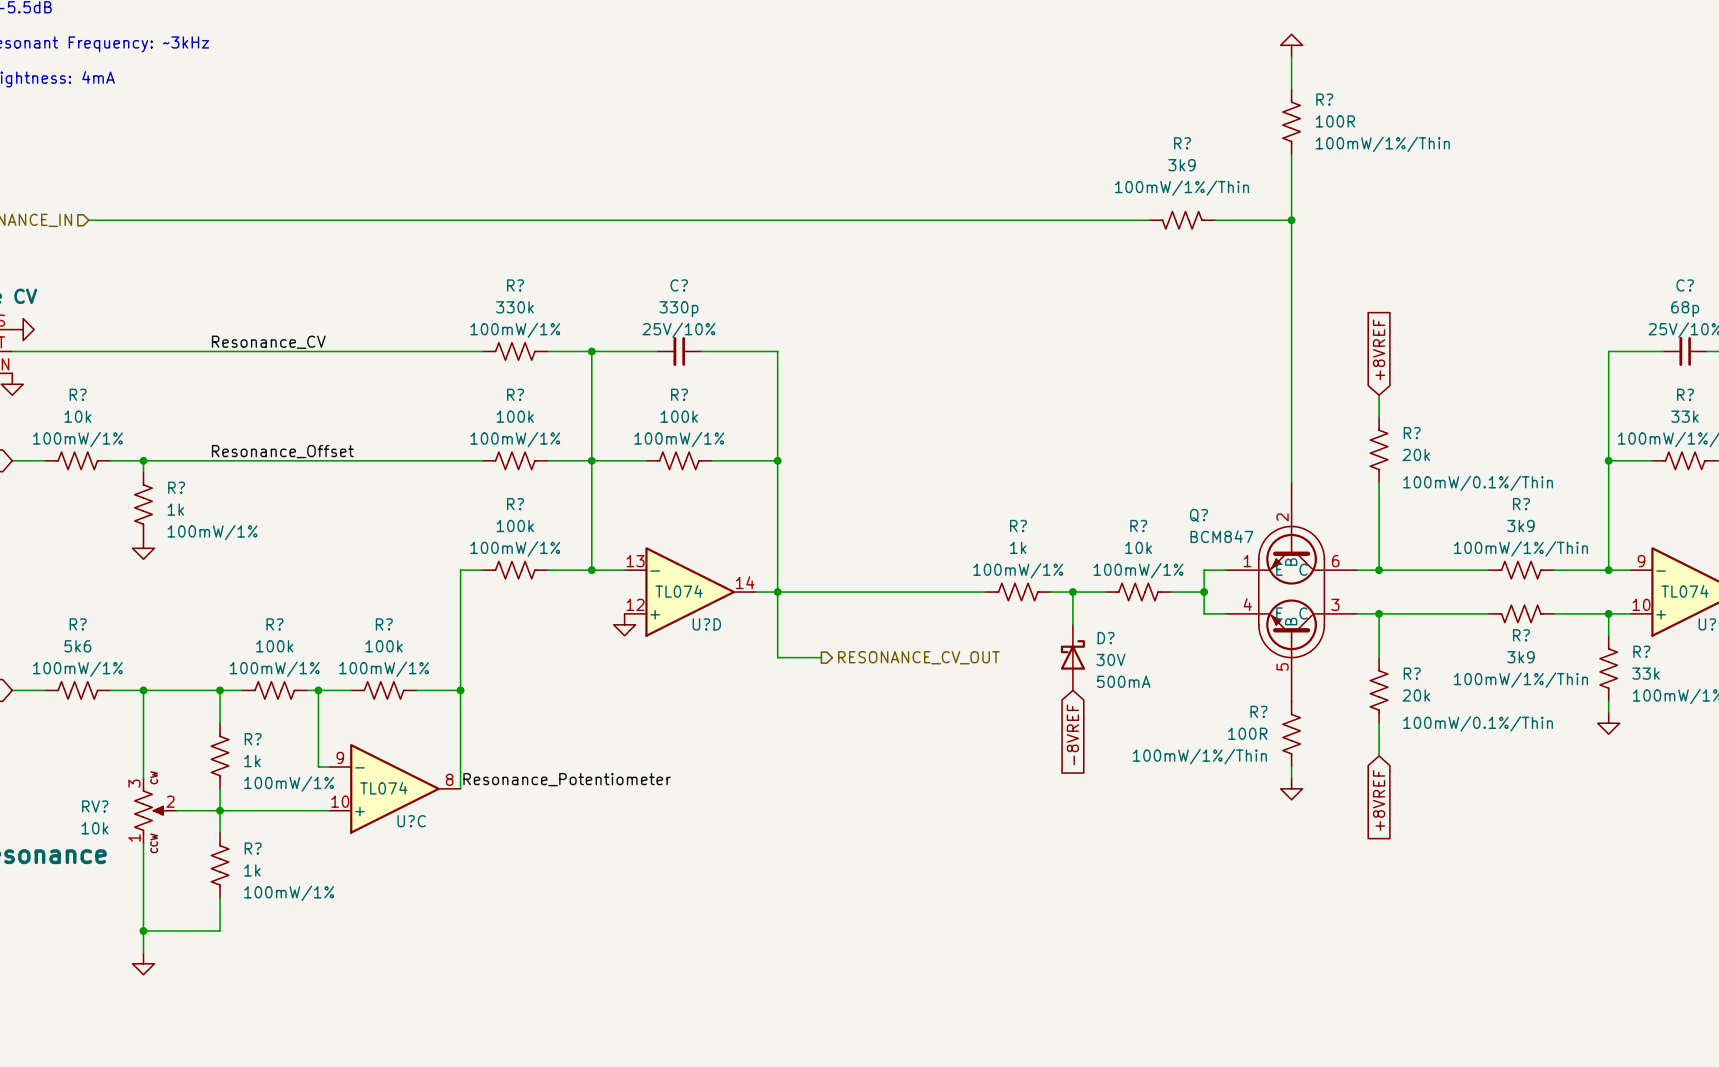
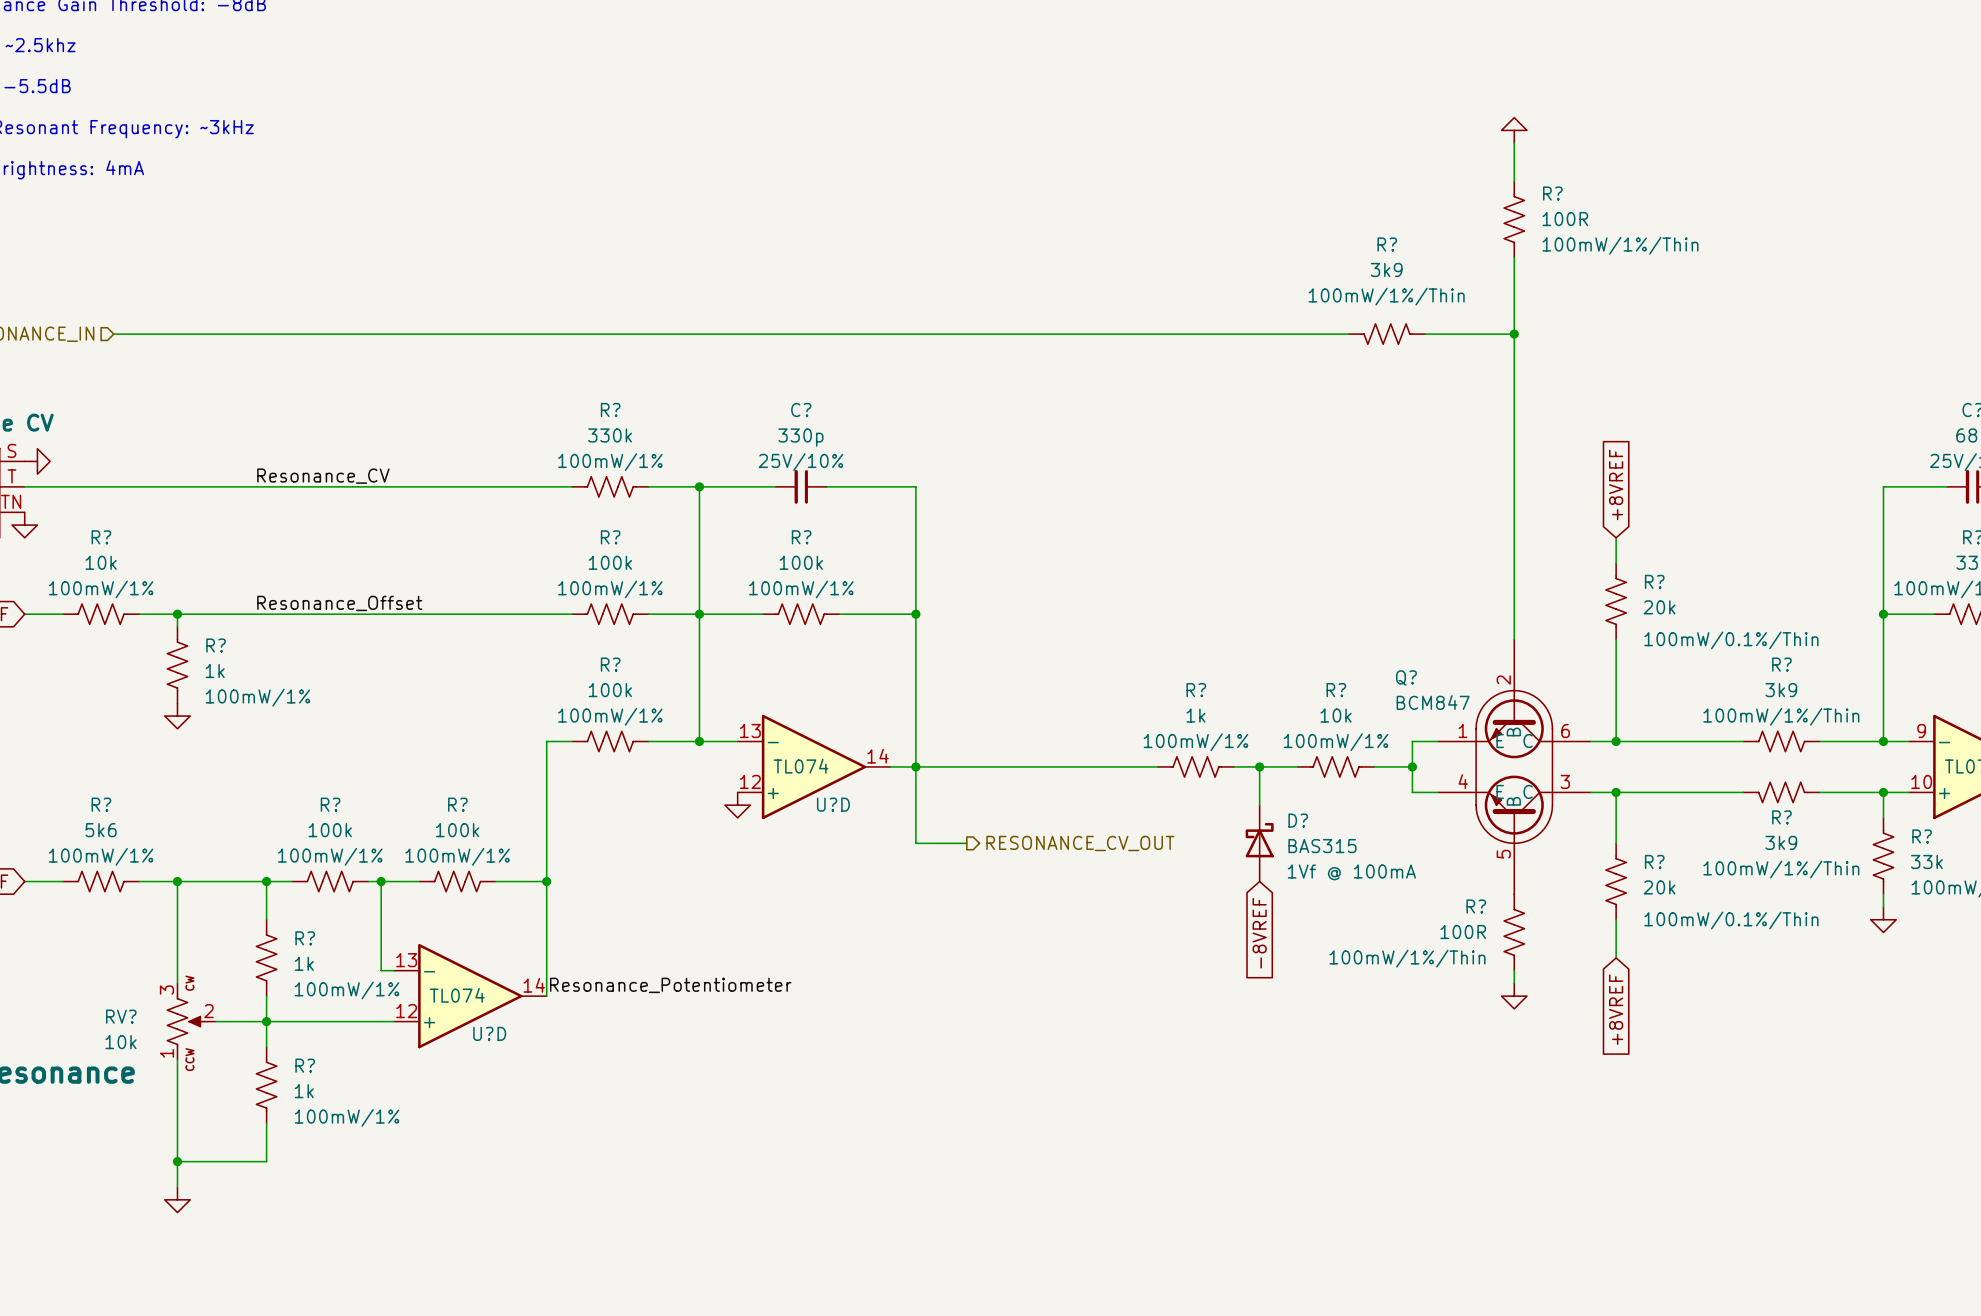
D? value: 30V (1110, 659) -> BAS315 (1322, 846)
D? text: 500mA (1123, 681) -> 1Vf @ 100mA (1351, 872)
U?C pin number: 9 (340, 757) -> 13 (406, 960)
U?C pin number: 8 (449, 779) -> 14 (534, 985)
U?C pin number: 10 (340, 801) -> 12 (406, 1011)
U?C name: U?C (411, 821) -> U?D (489, 1033)

